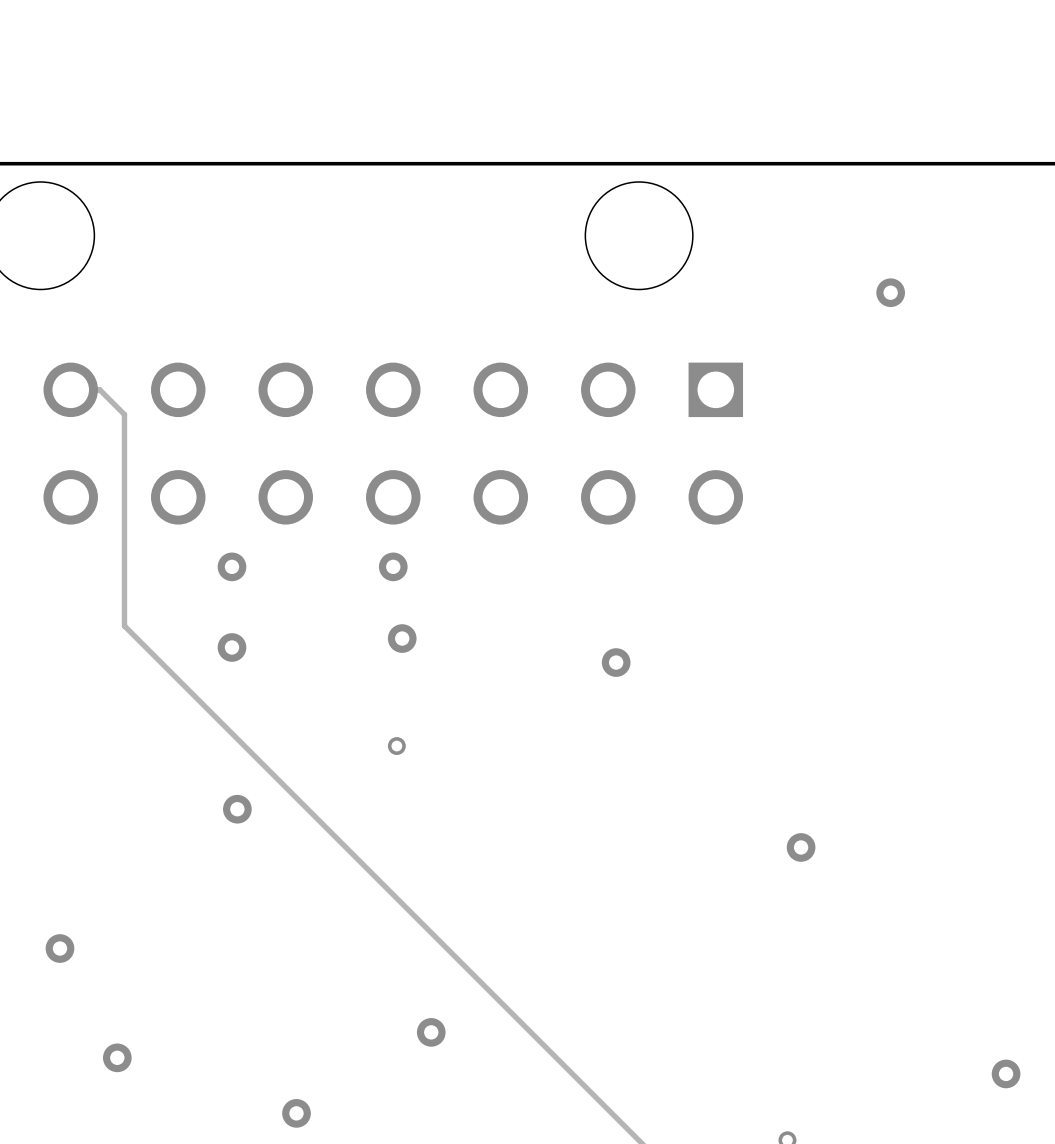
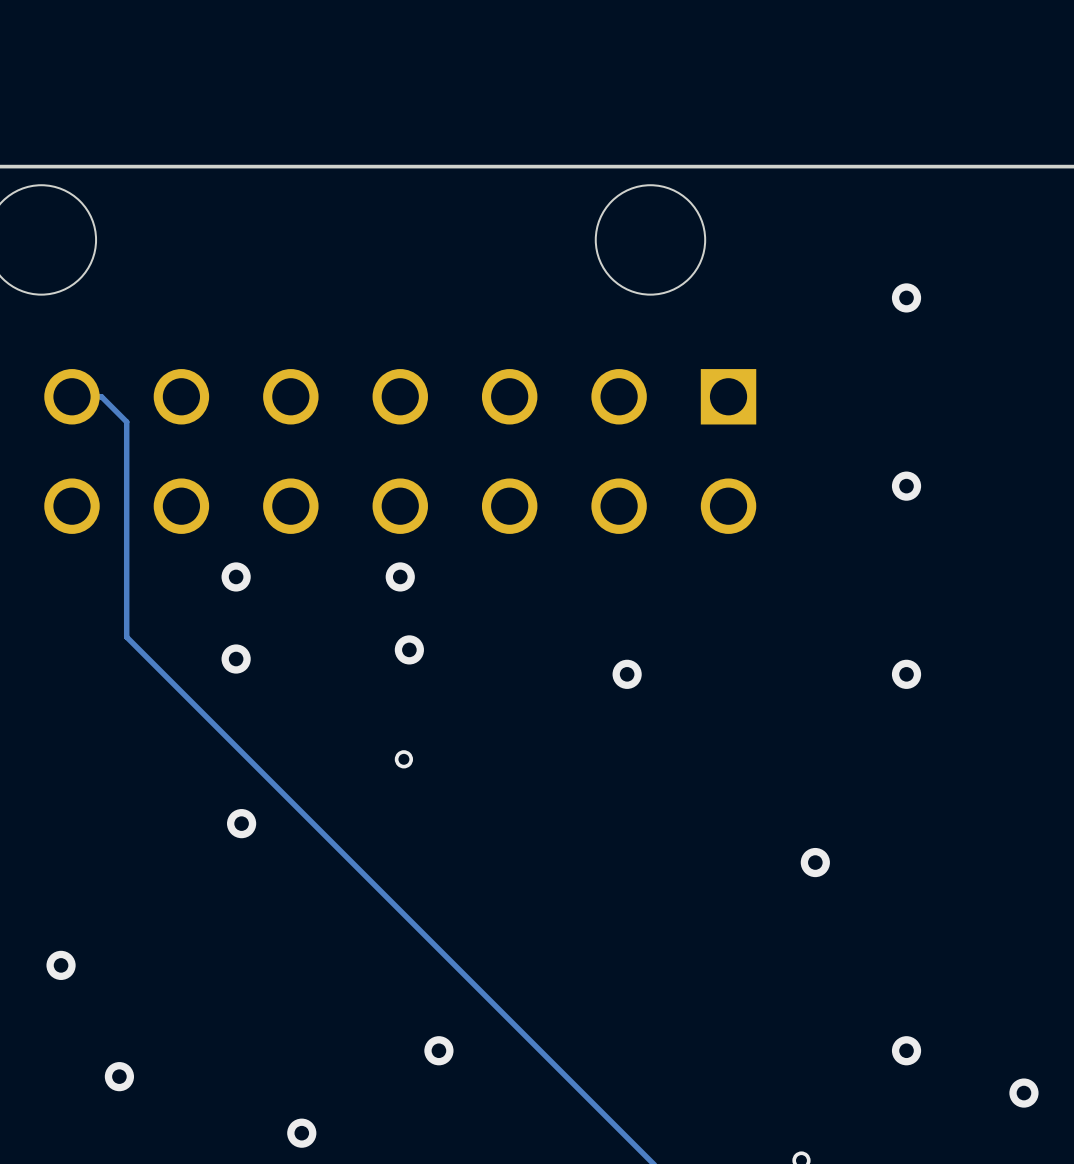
via: none -> (906, 486)
via: none -> (906, 674)
via: none -> (906, 1050)

